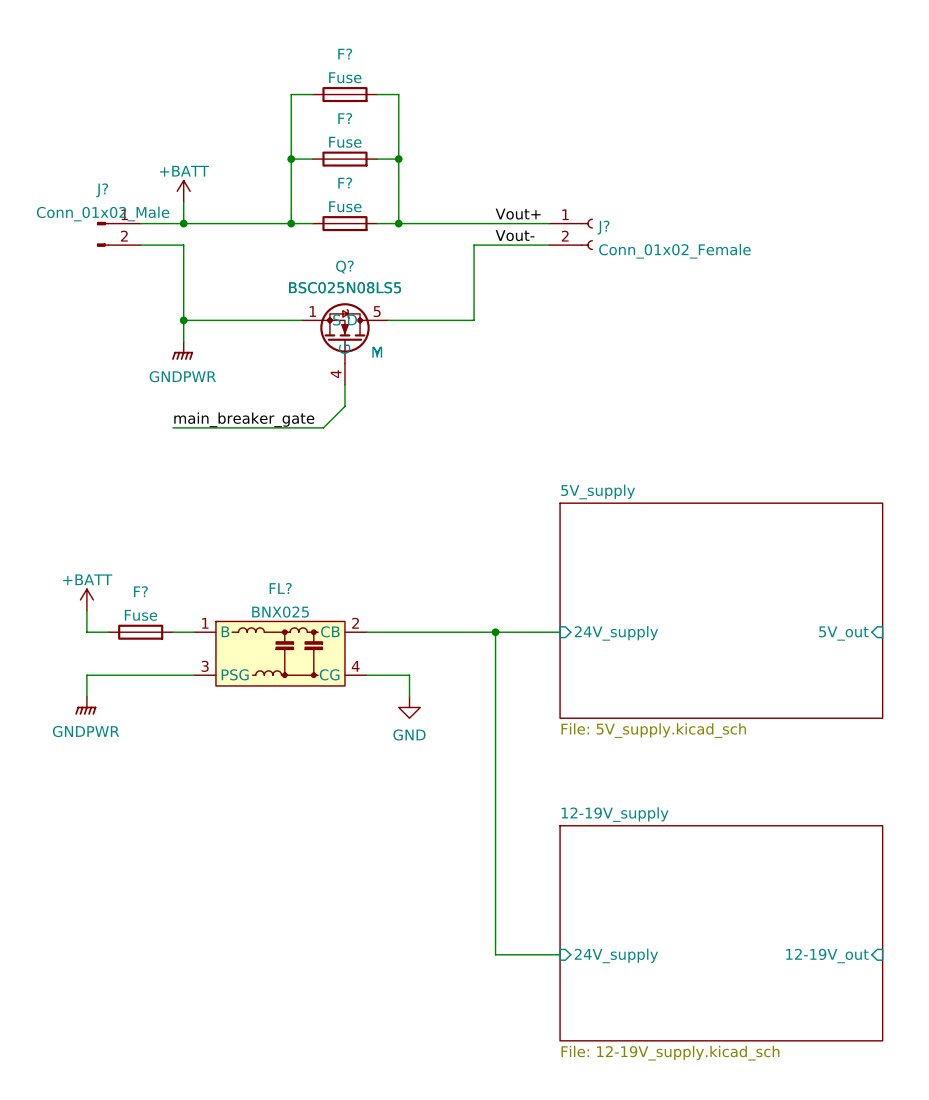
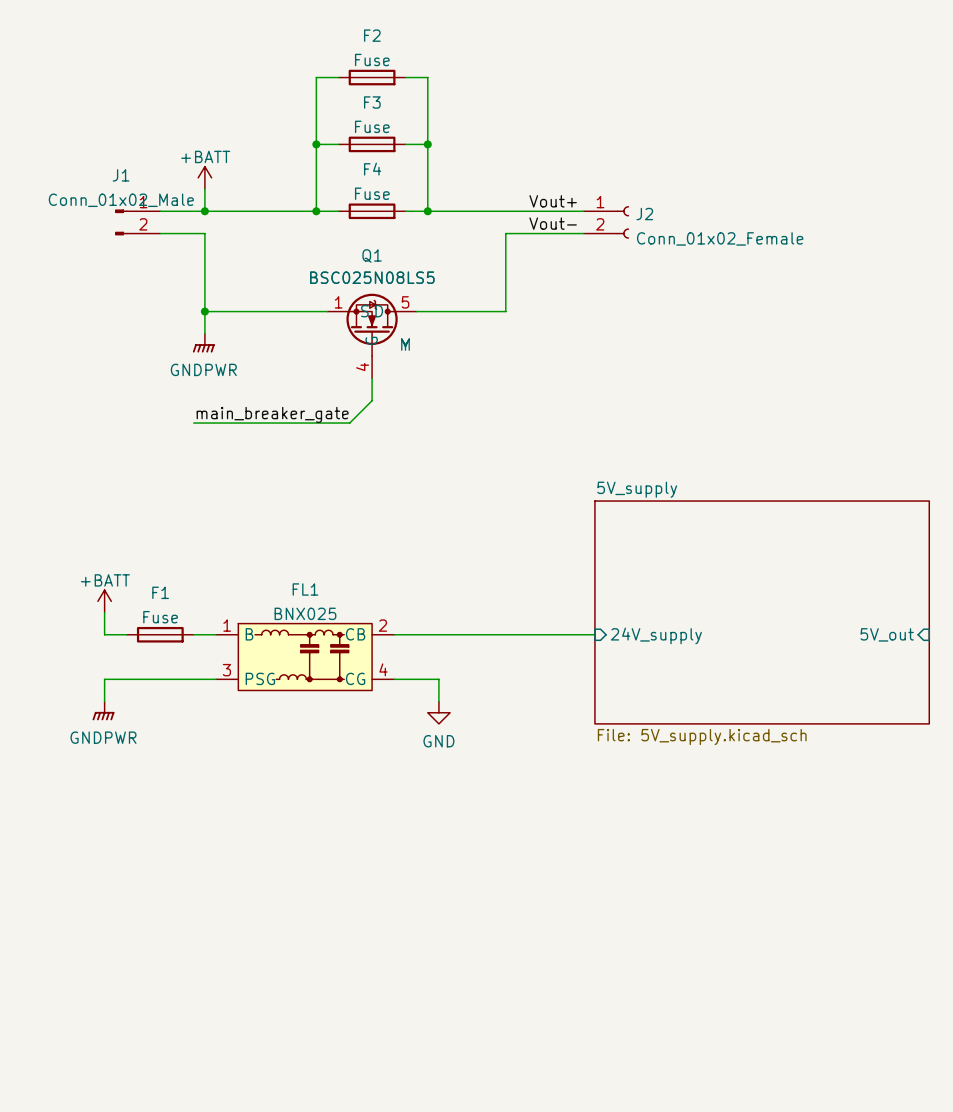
F? name: F? (345, 54) -> F2 (372, 35)
F? name: F? (345, 118) -> F3 (372, 102)
F? name: F? (345, 183) -> F4 (372, 169)
J? name: J? (102, 190) -> J1 (121, 175)
J? name: J? (603, 227) -> J2 (644, 214)
Q? name: Q? (344, 267) -> Q1 (372, 255)
FL? name: FL? (280, 588) -> FL1 (305, 589)
F? name: F? (140, 591) -> F1 (160, 592)
wire: (495, 632) (495, 954) (560, 954) -> none
junction: (495, 632) -> none
sheet 12-19V_supply: File: 12-19V_supply.kicad_sch (721, 933) -> none
sheet pin: 24V_supply (616, 955) -> none
sheet pin: 12-19V_out (827, 956) -> none

